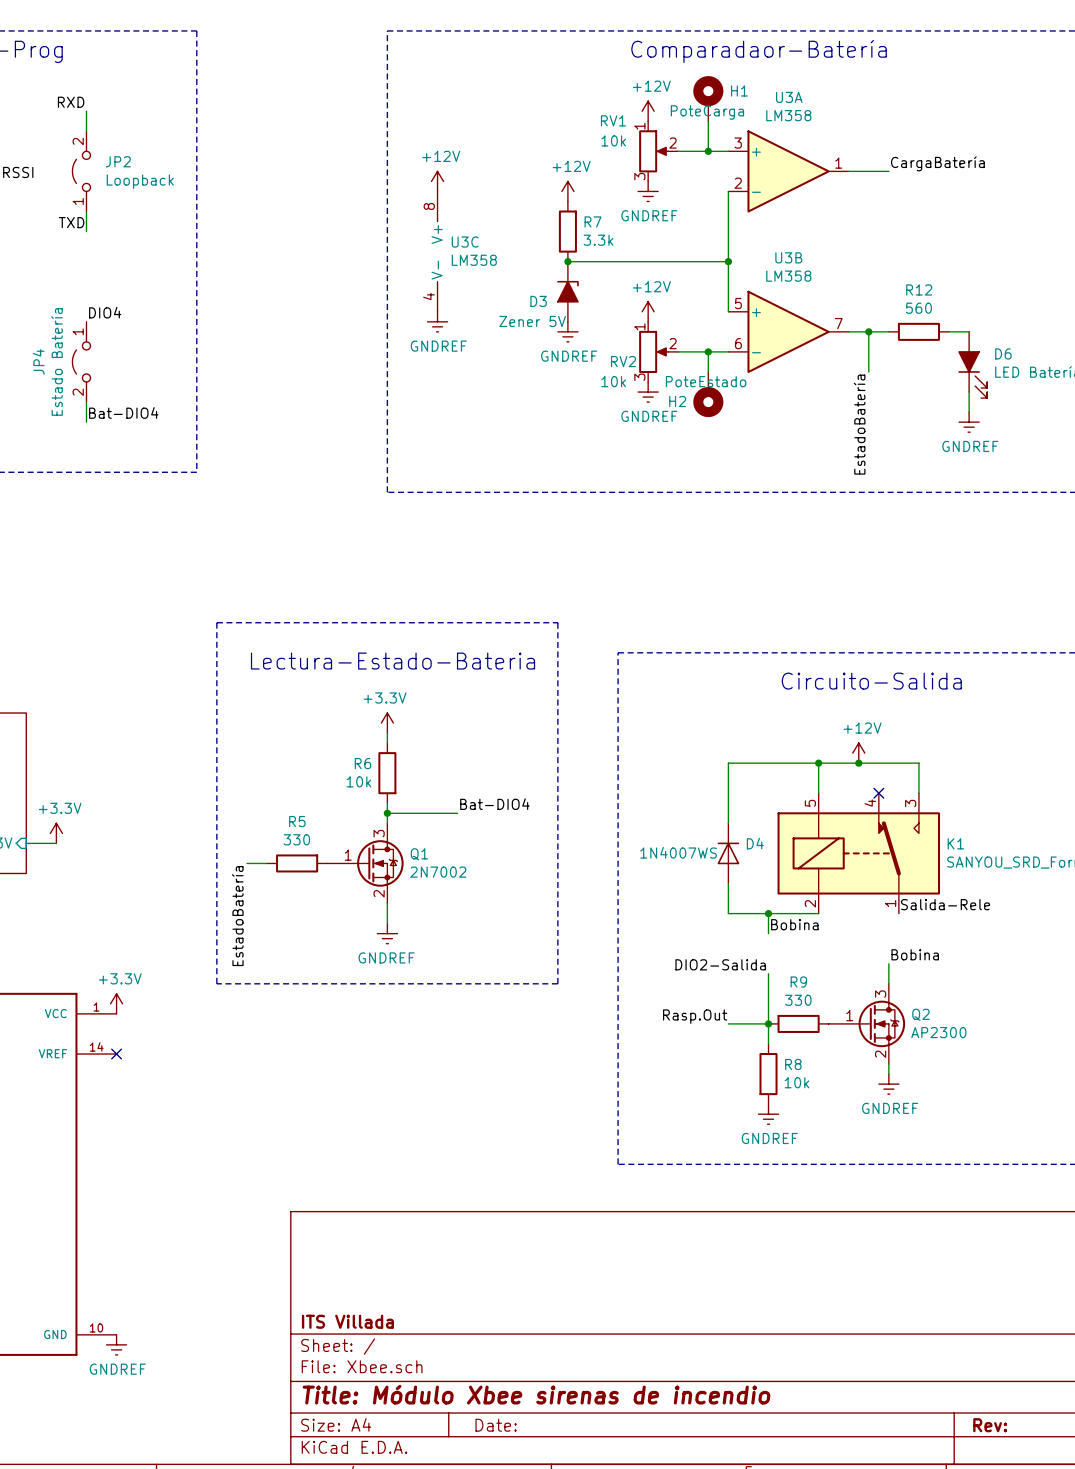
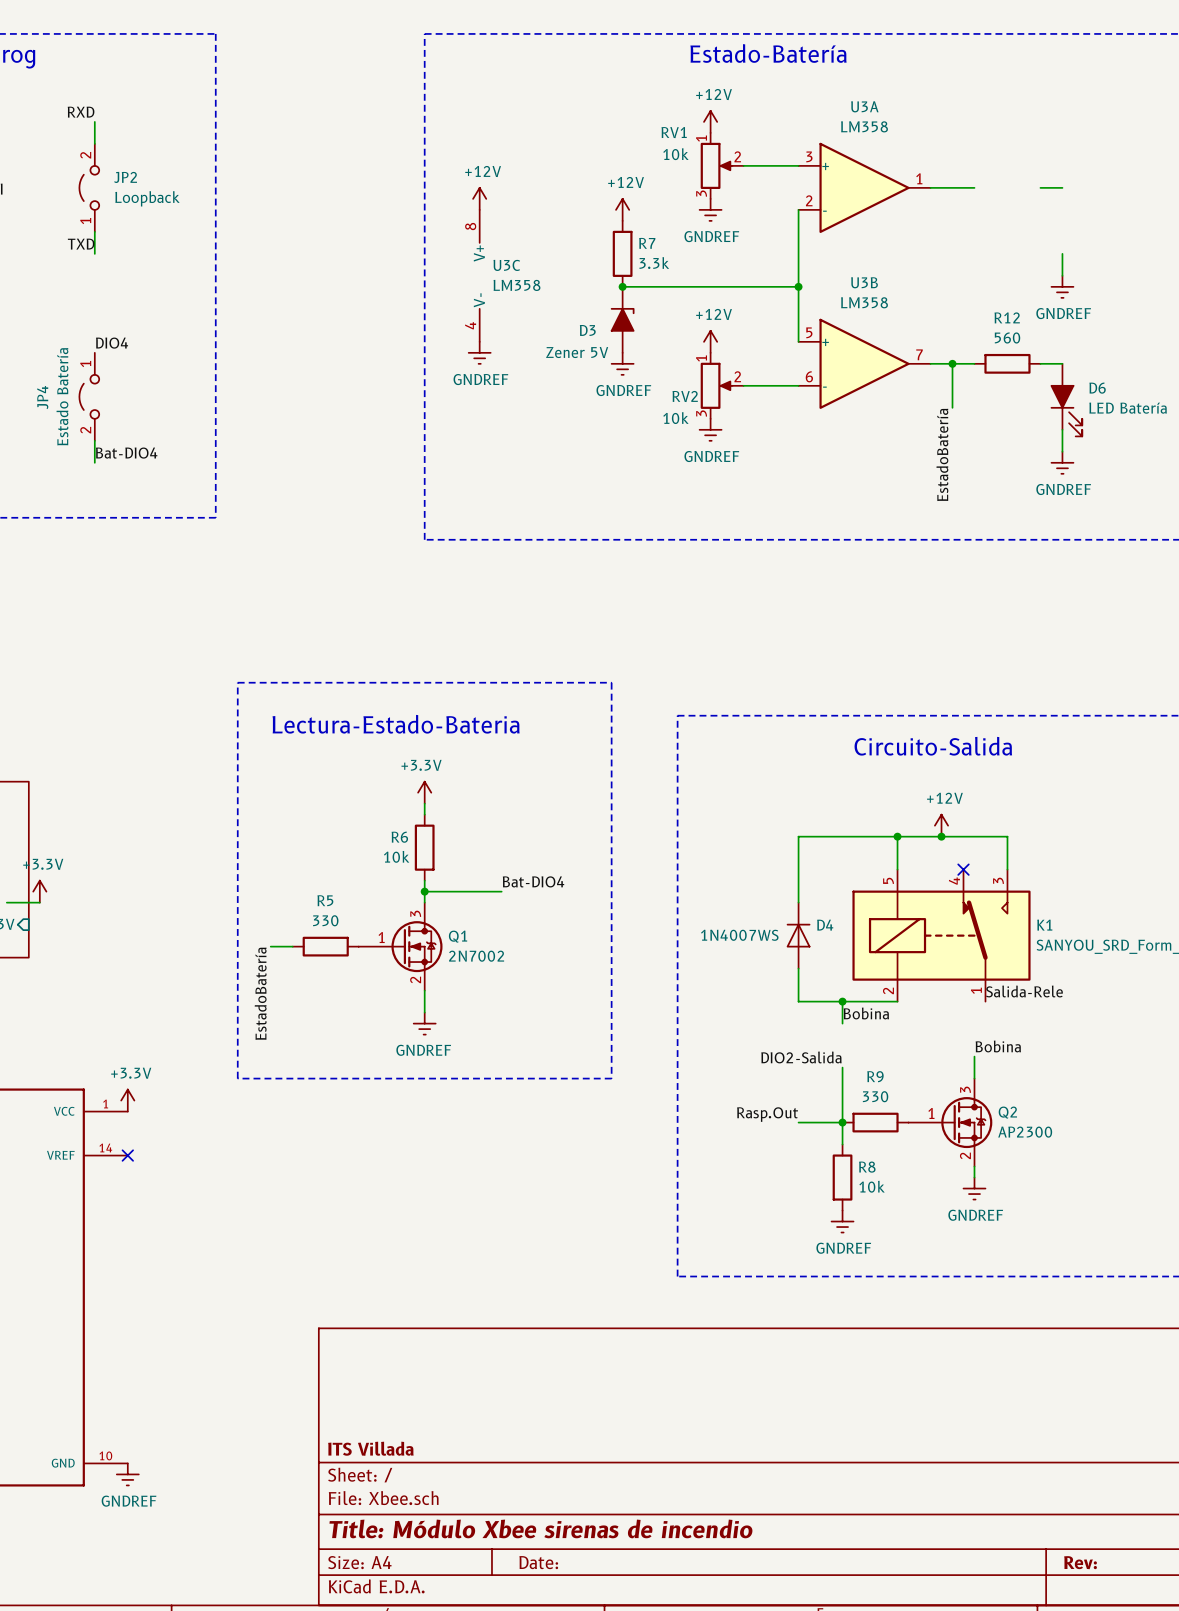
text: Comparadaor-Batería (759, 51) -> Estado-Batería (768, 53)
H1: PoteCarga (708, 98) -> none
wire: (708, 121) (708, 151) -> none
junction: (708, 151) -> none
label: CargaBatería (937, 163) -> none
wire: none -> (1040, 187) (1062, 187)
wire: none -> (1062, 253) (1062, 275)
power symbol: none -> GNDREF (1062, 286)
wire: (708, 351) (708, 371) -> none
junction: (708, 351) -> none
H2: PoteEstado (708, 394) -> none
power symbol position: +3.3V (56, 833) -> +3.3V (39, 891)
wire: (26, 843) (56, 843) -> (6, 902) (39, 902)

